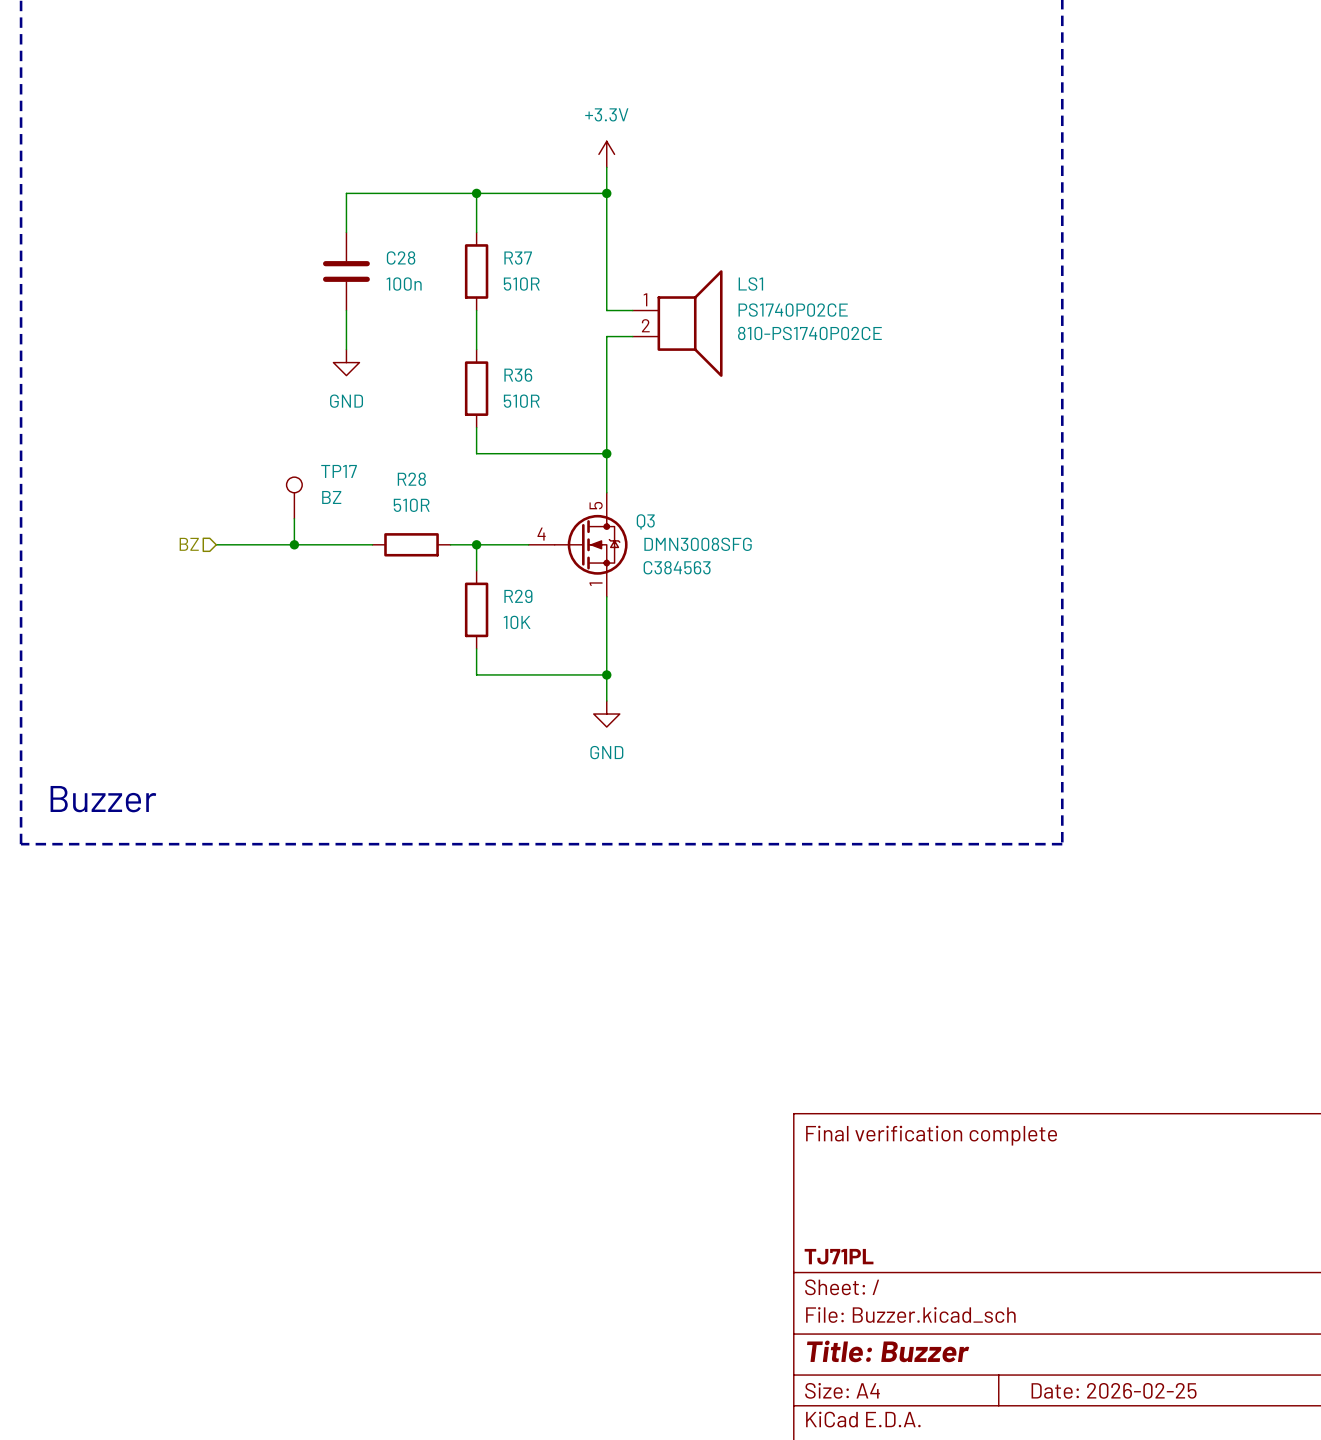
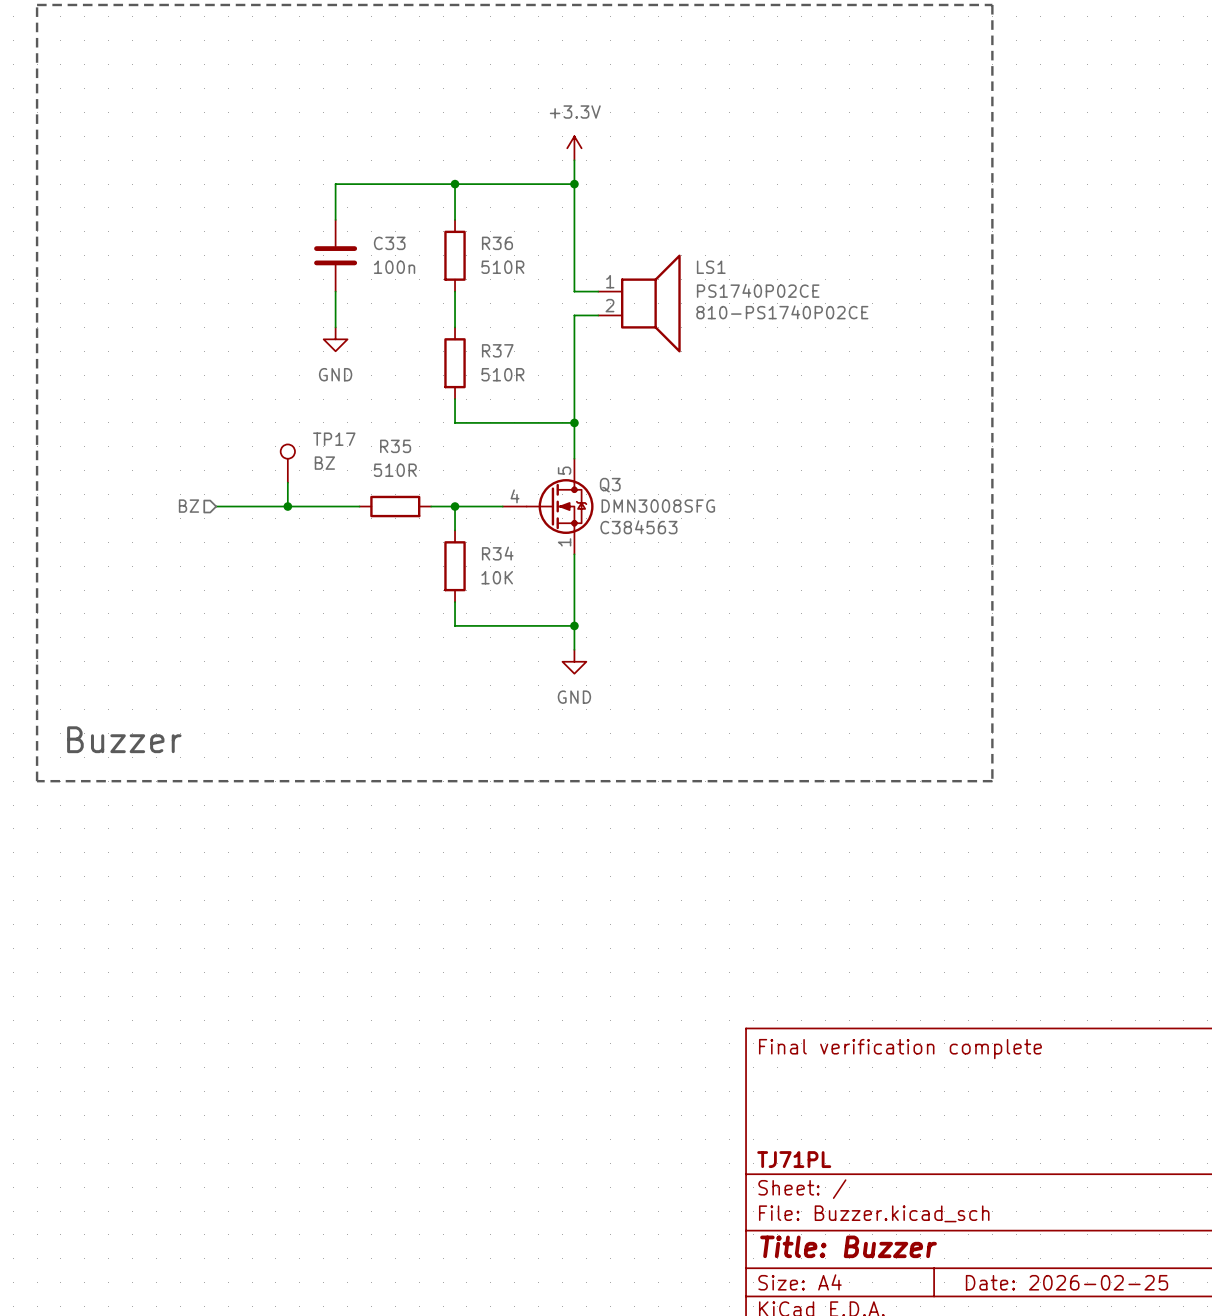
C28 name: C28 (401, 257) -> C33 (389, 243)
R37 name: R37 (518, 258) -> R36 (497, 243)
R36 name: R36 (518, 375) -> R37 (497, 350)
R28 name: R28 (411, 479) -> R35 (395, 446)
R29 name: R29 (518, 596) -> R34 (497, 553)

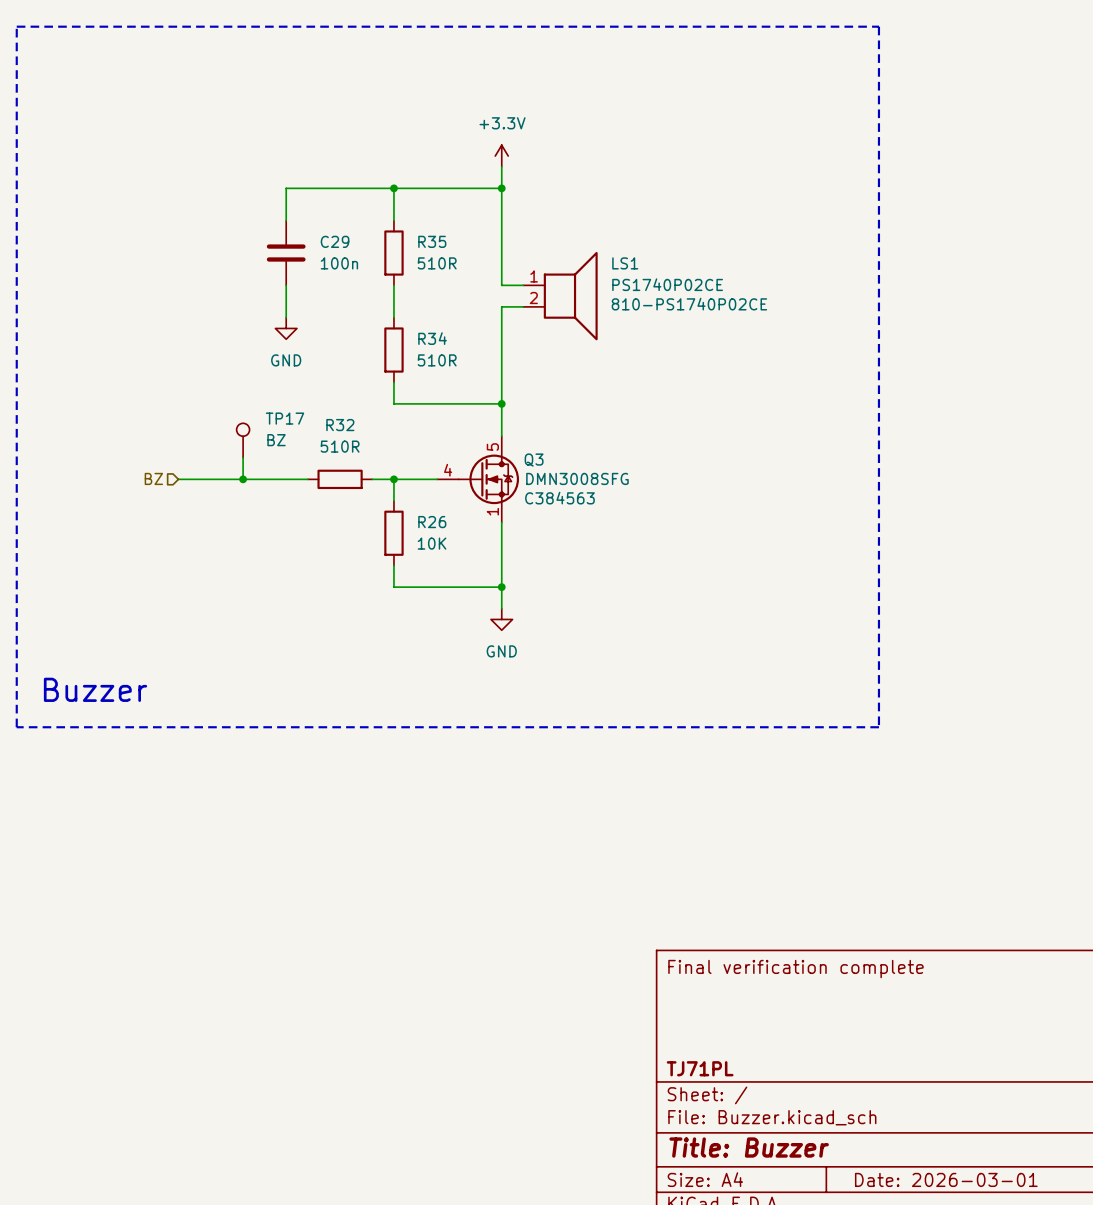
C33 name: C33 (389, 243) -> C29 (335, 241)
R36 name: R36 (497, 243) -> R35 (432, 241)
R37 name: R37 (497, 350) -> R34 (432, 338)
R35 name: R35 (395, 446) -> R32 (340, 425)
R34 name: R34 (497, 553) -> R26 (432, 522)
title block: Date: 2026-02-25 (1067, 1282) -> Date: 2026-03-01 (946, 1179)

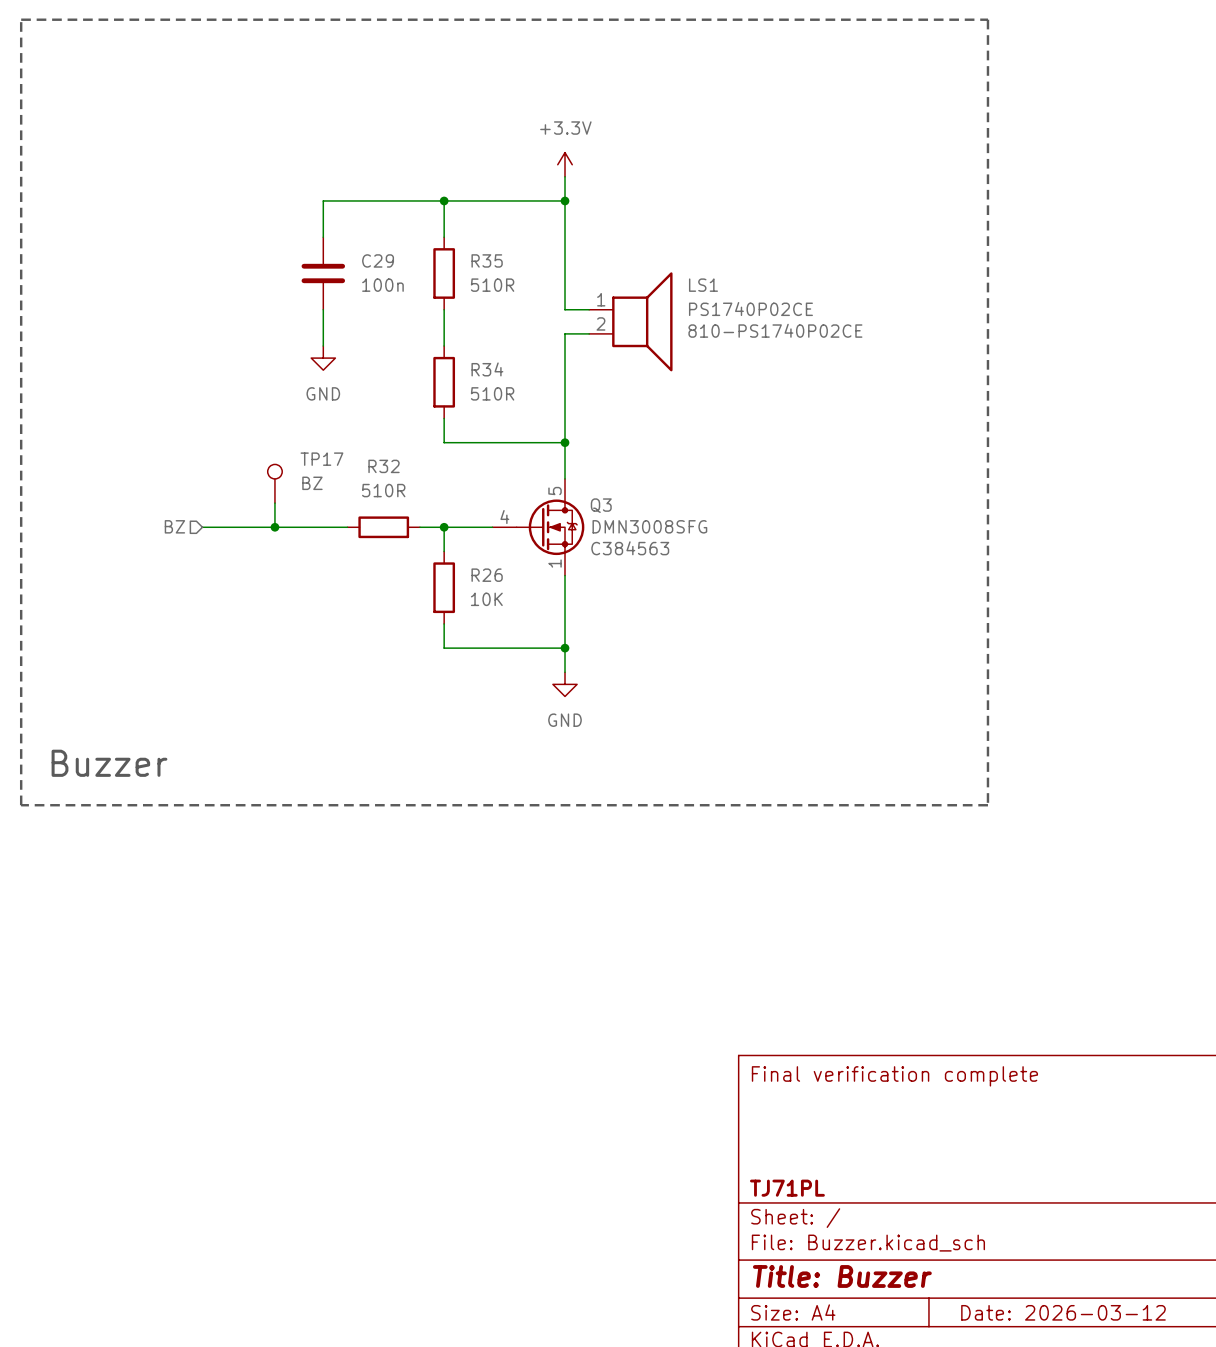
title block: Date: 2026-03-01 (946, 1179) -> Date: 2026-03-12 (1063, 1312)

